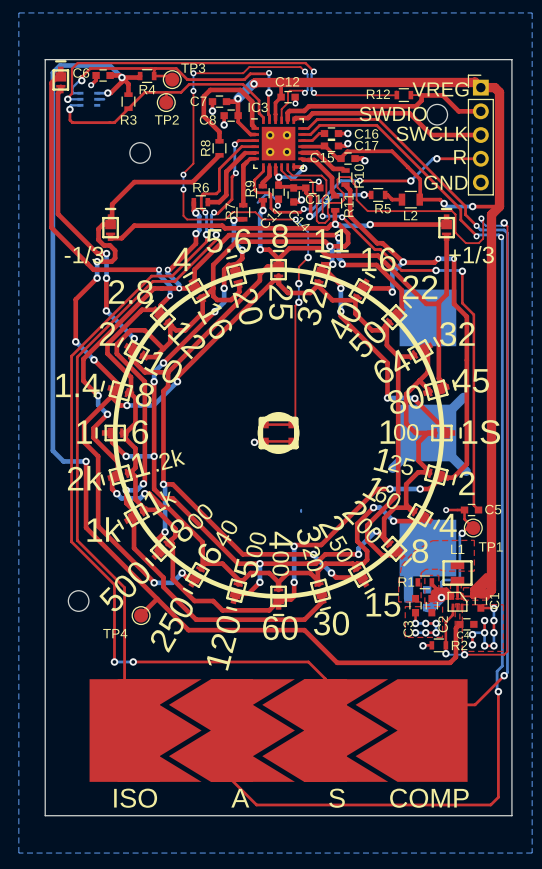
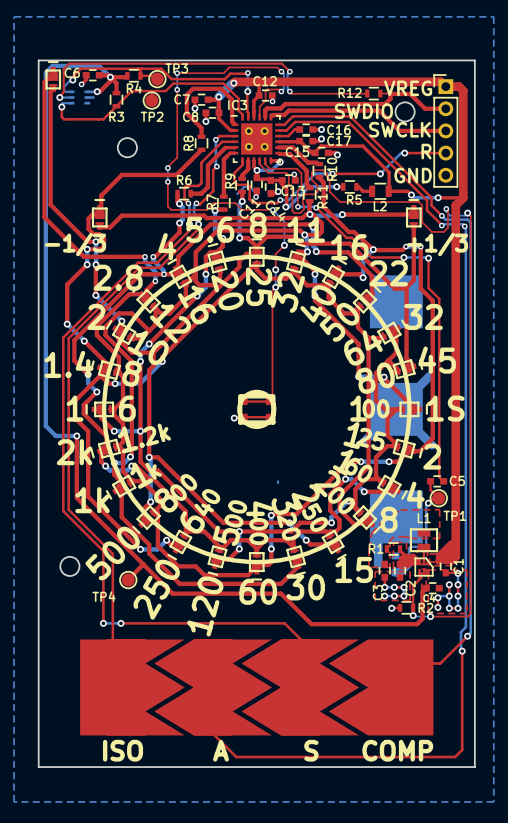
top track: (446, 510) (464, 510) -> none
via: (446, 510) -> none
via: (441, 597) -> none

